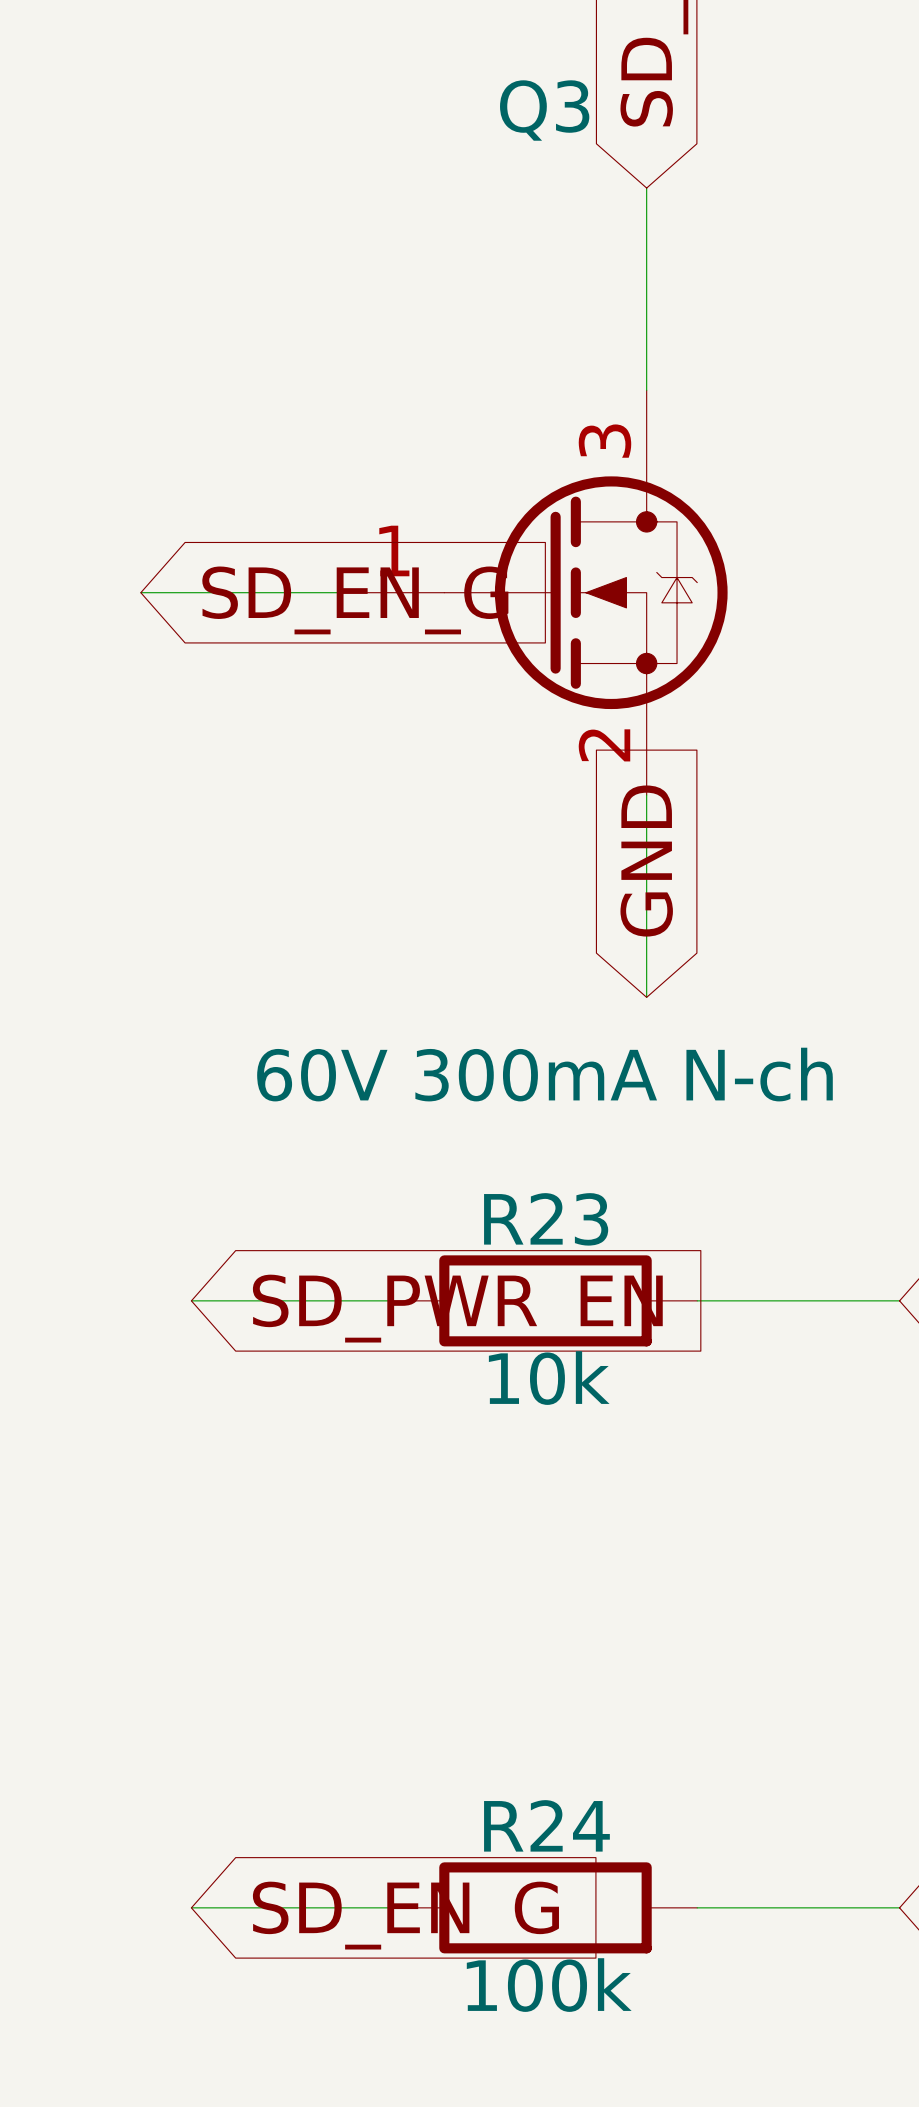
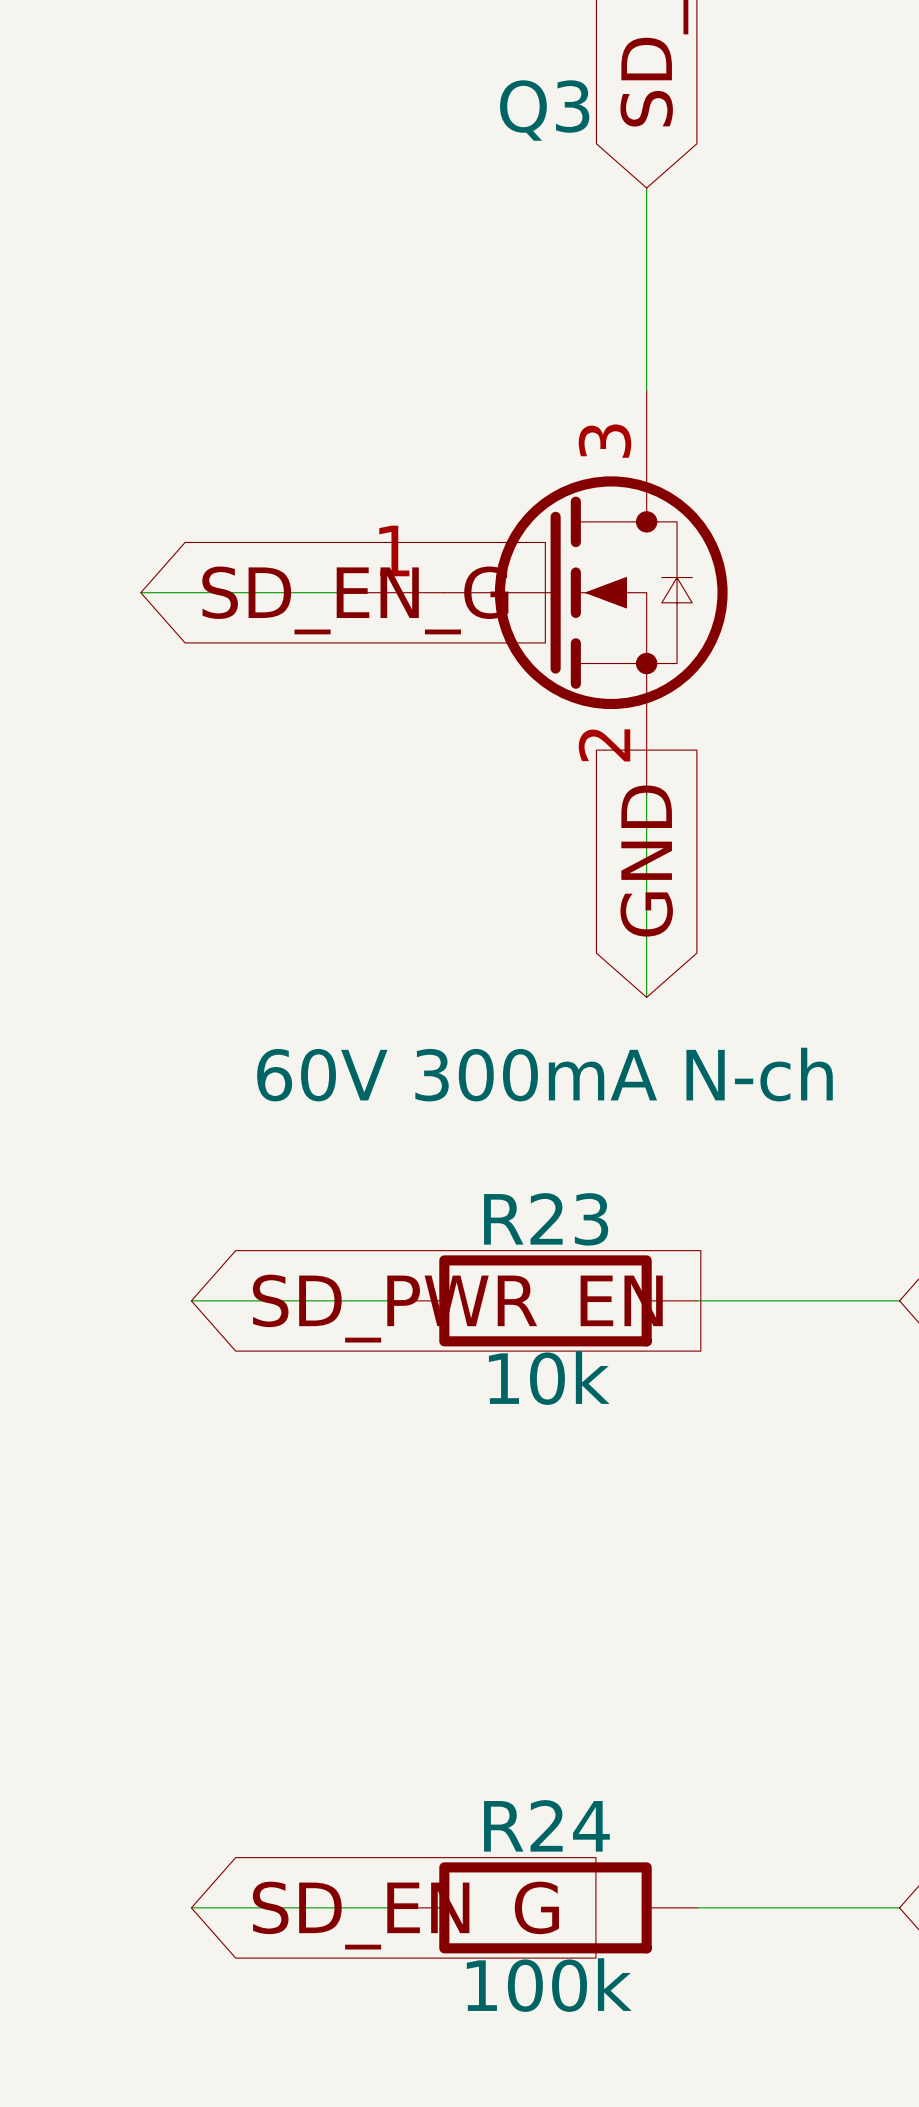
Q3 symbol: [343, 390, 728, 796] -> [343, 390, 728, 796]

